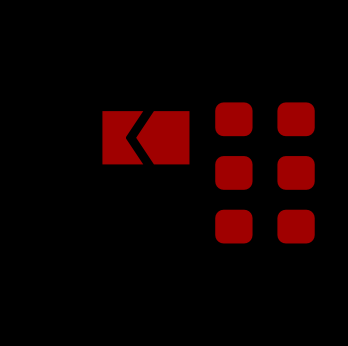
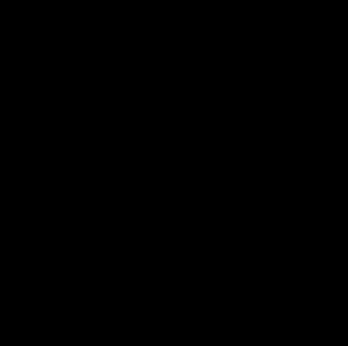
part: (264, 119) -> none
part: (145, 137) -> none
part: (264, 172) -> none
part: (264, 226) -> none

